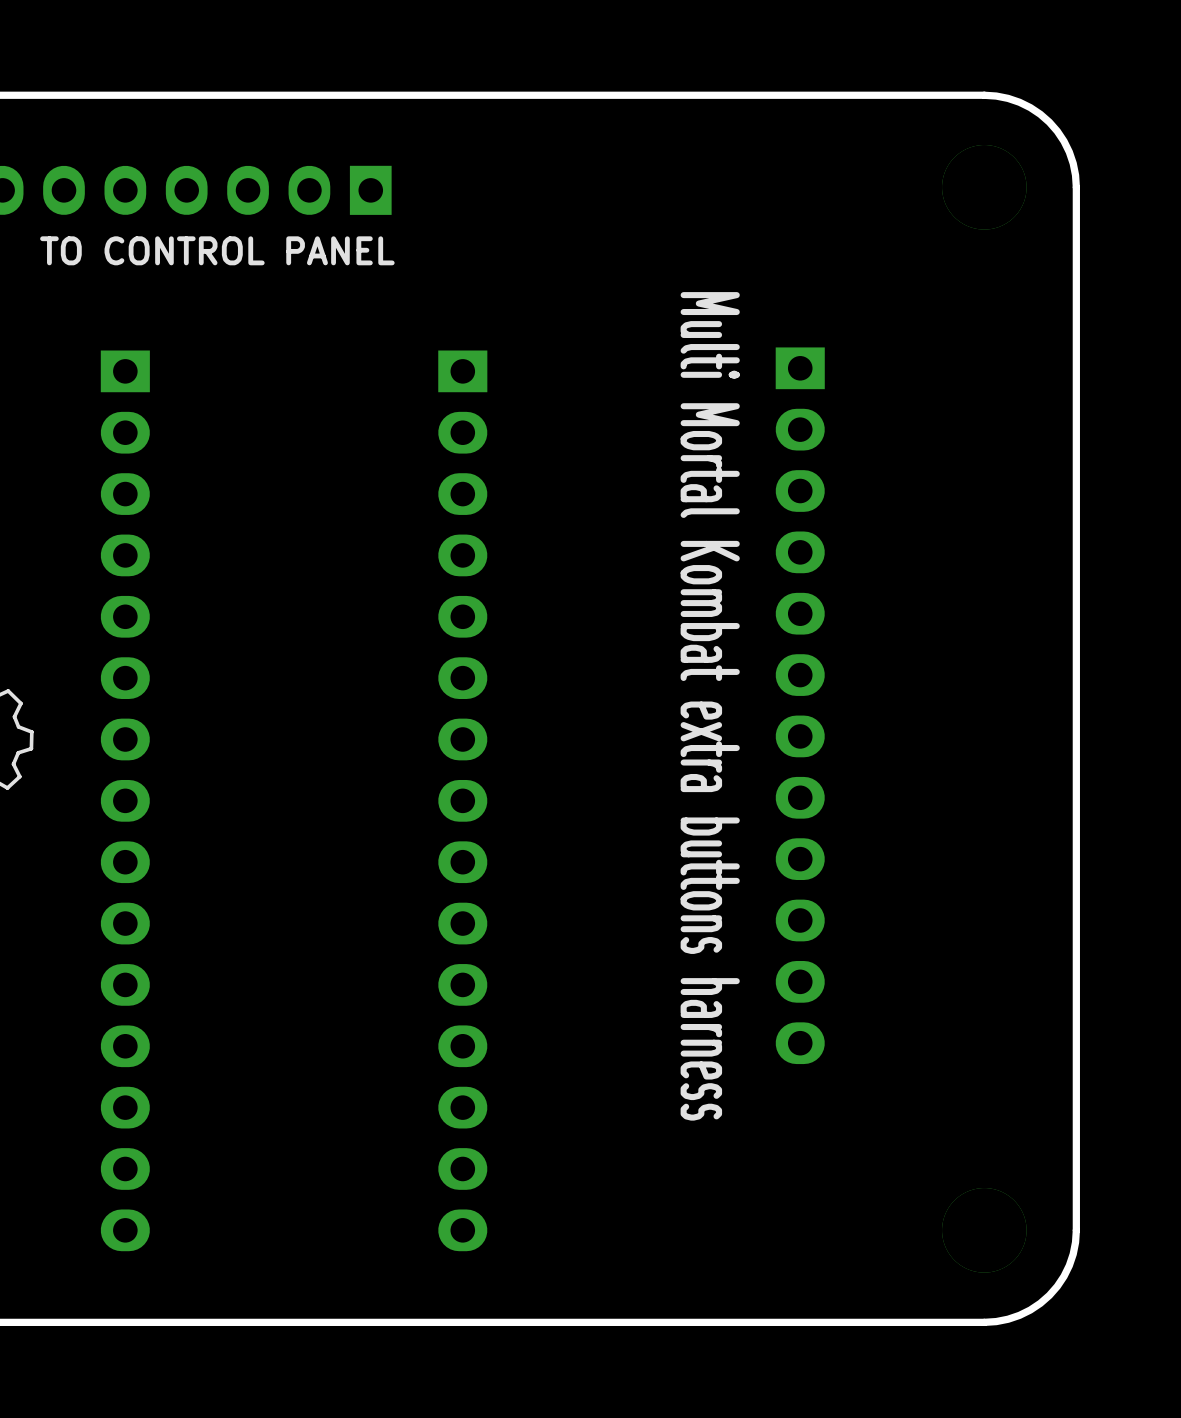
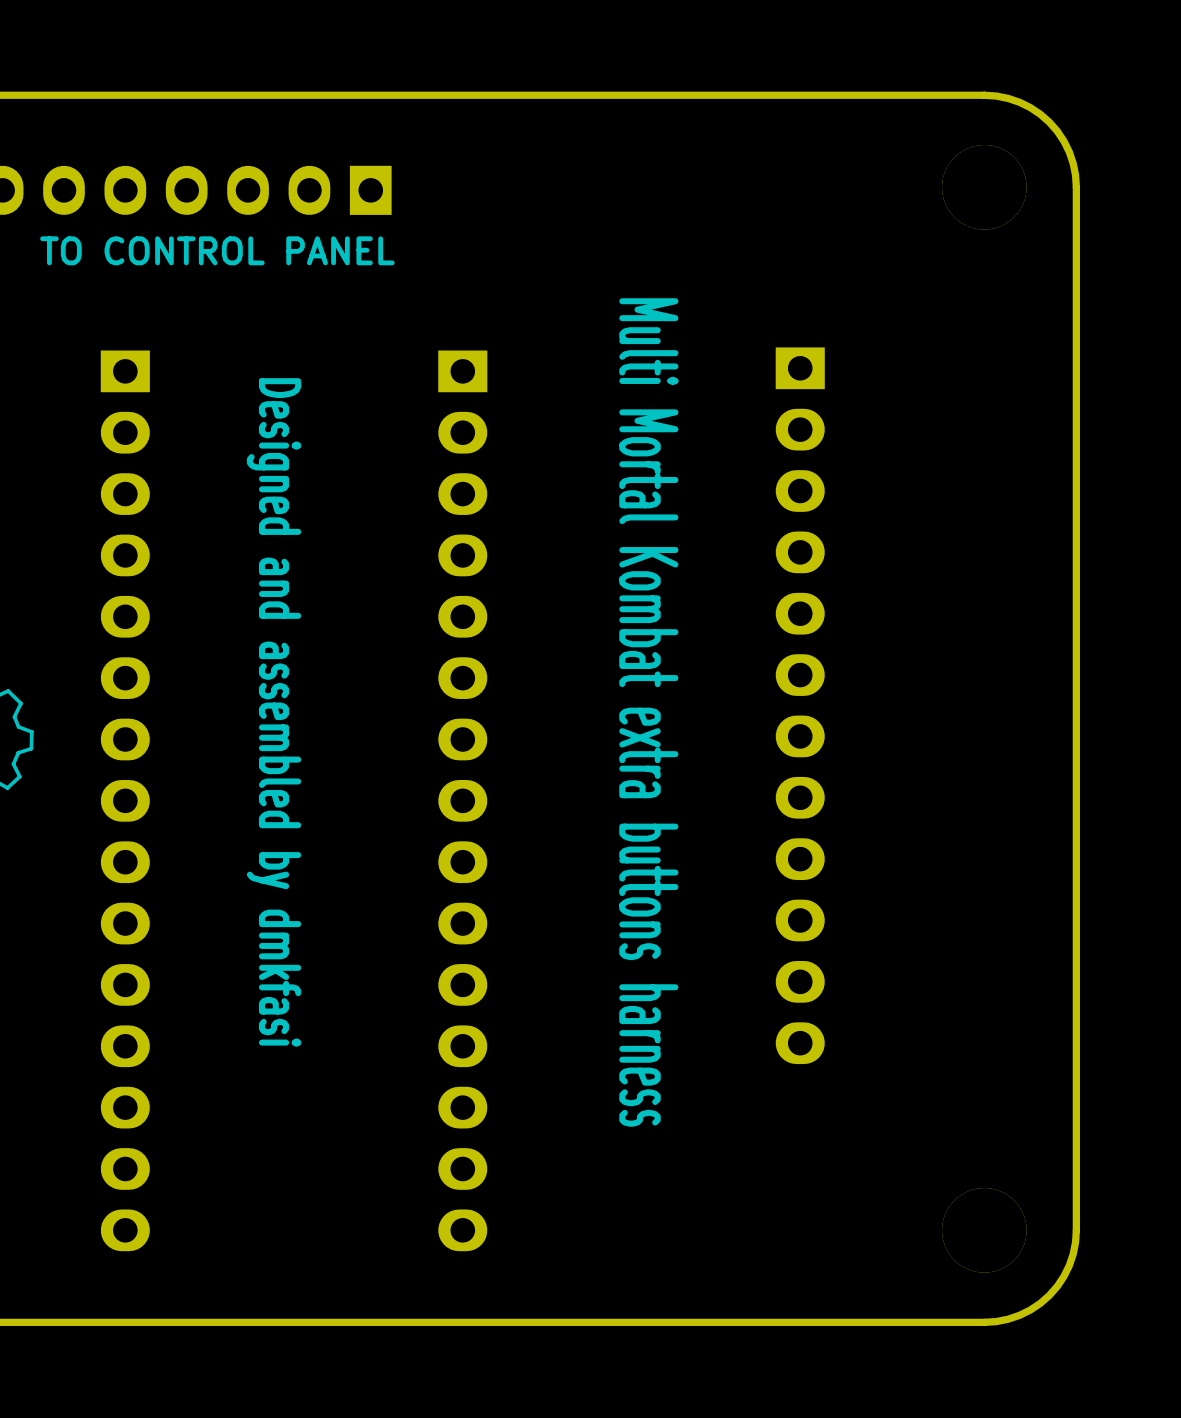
text position: Multi Mortal Kombat extra buttons harness (710, 706) -> Multi Mortal Kombat extra buttons harness (648, 712)
text: none -> Designed and assembled by dmkfasi (274, 712)

